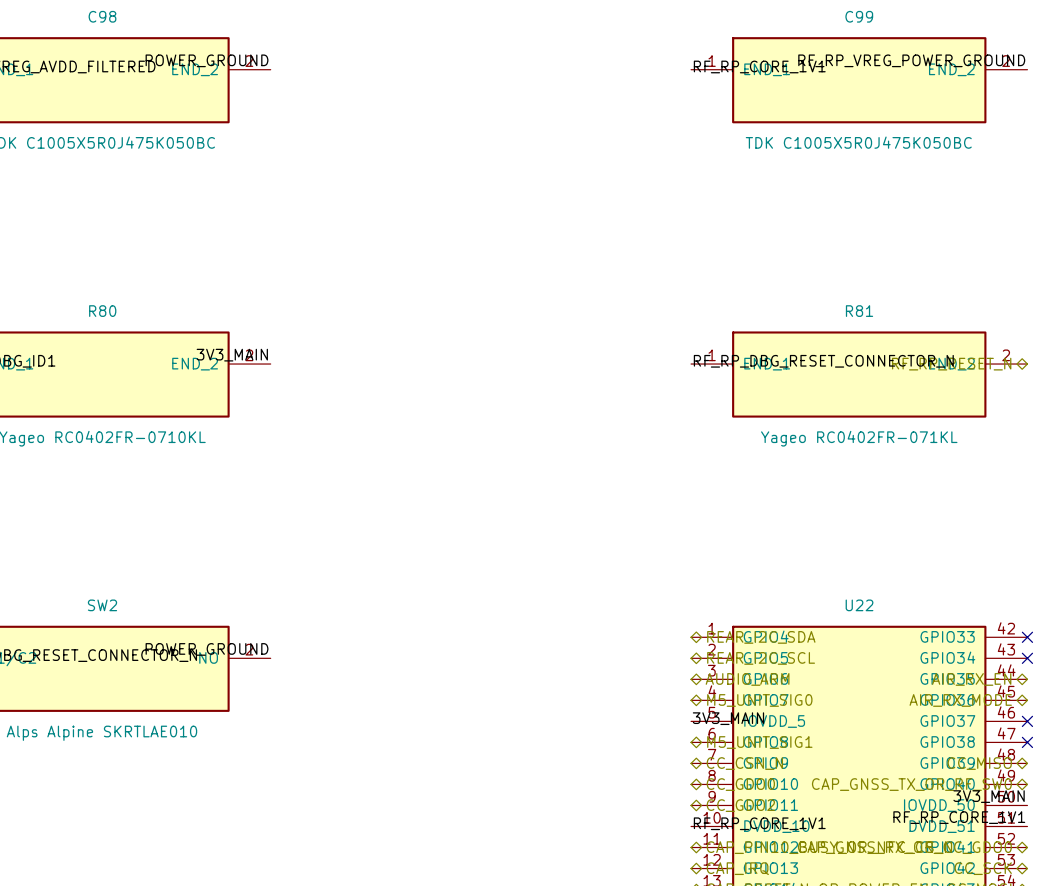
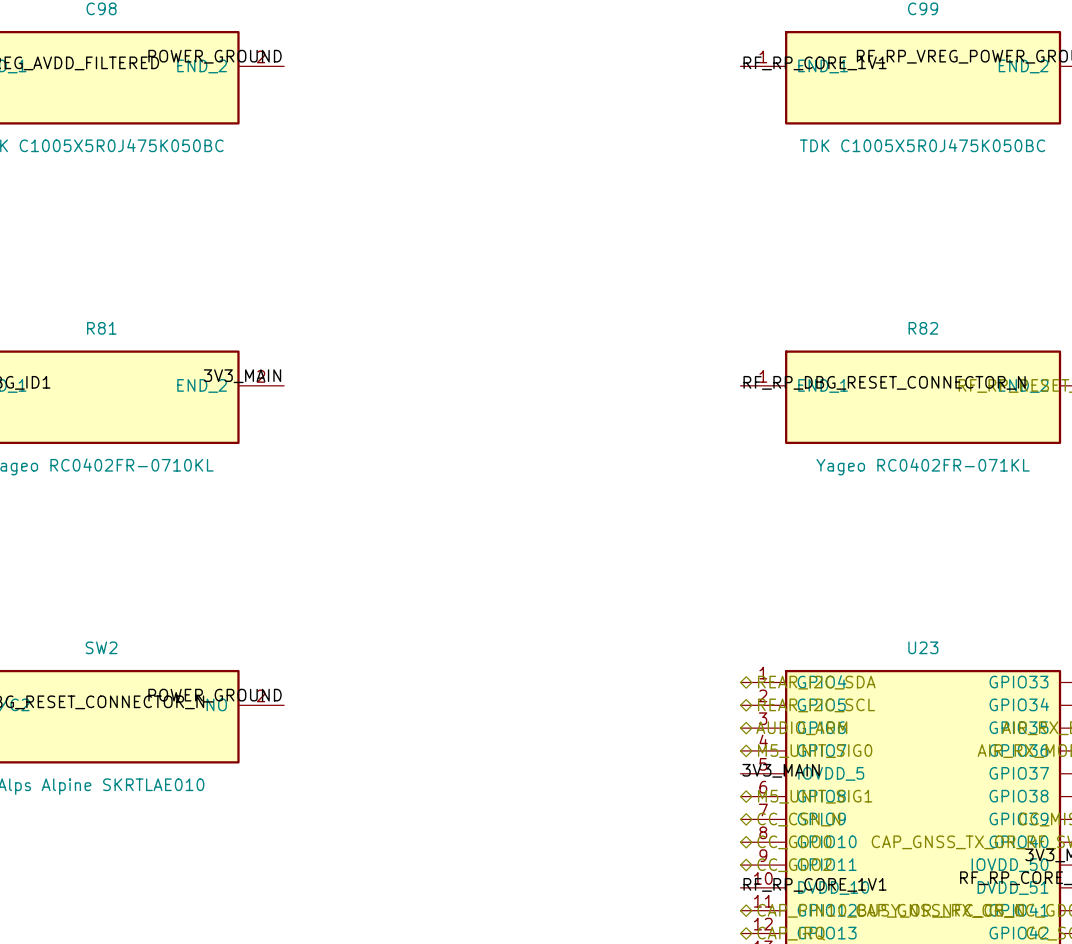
R80 name: R80 (102, 311) -> R81 (101, 328)
R81 name: R81 (859, 311) -> R82 (923, 328)
U22 name: U22 (859, 605) -> U23 (923, 647)

